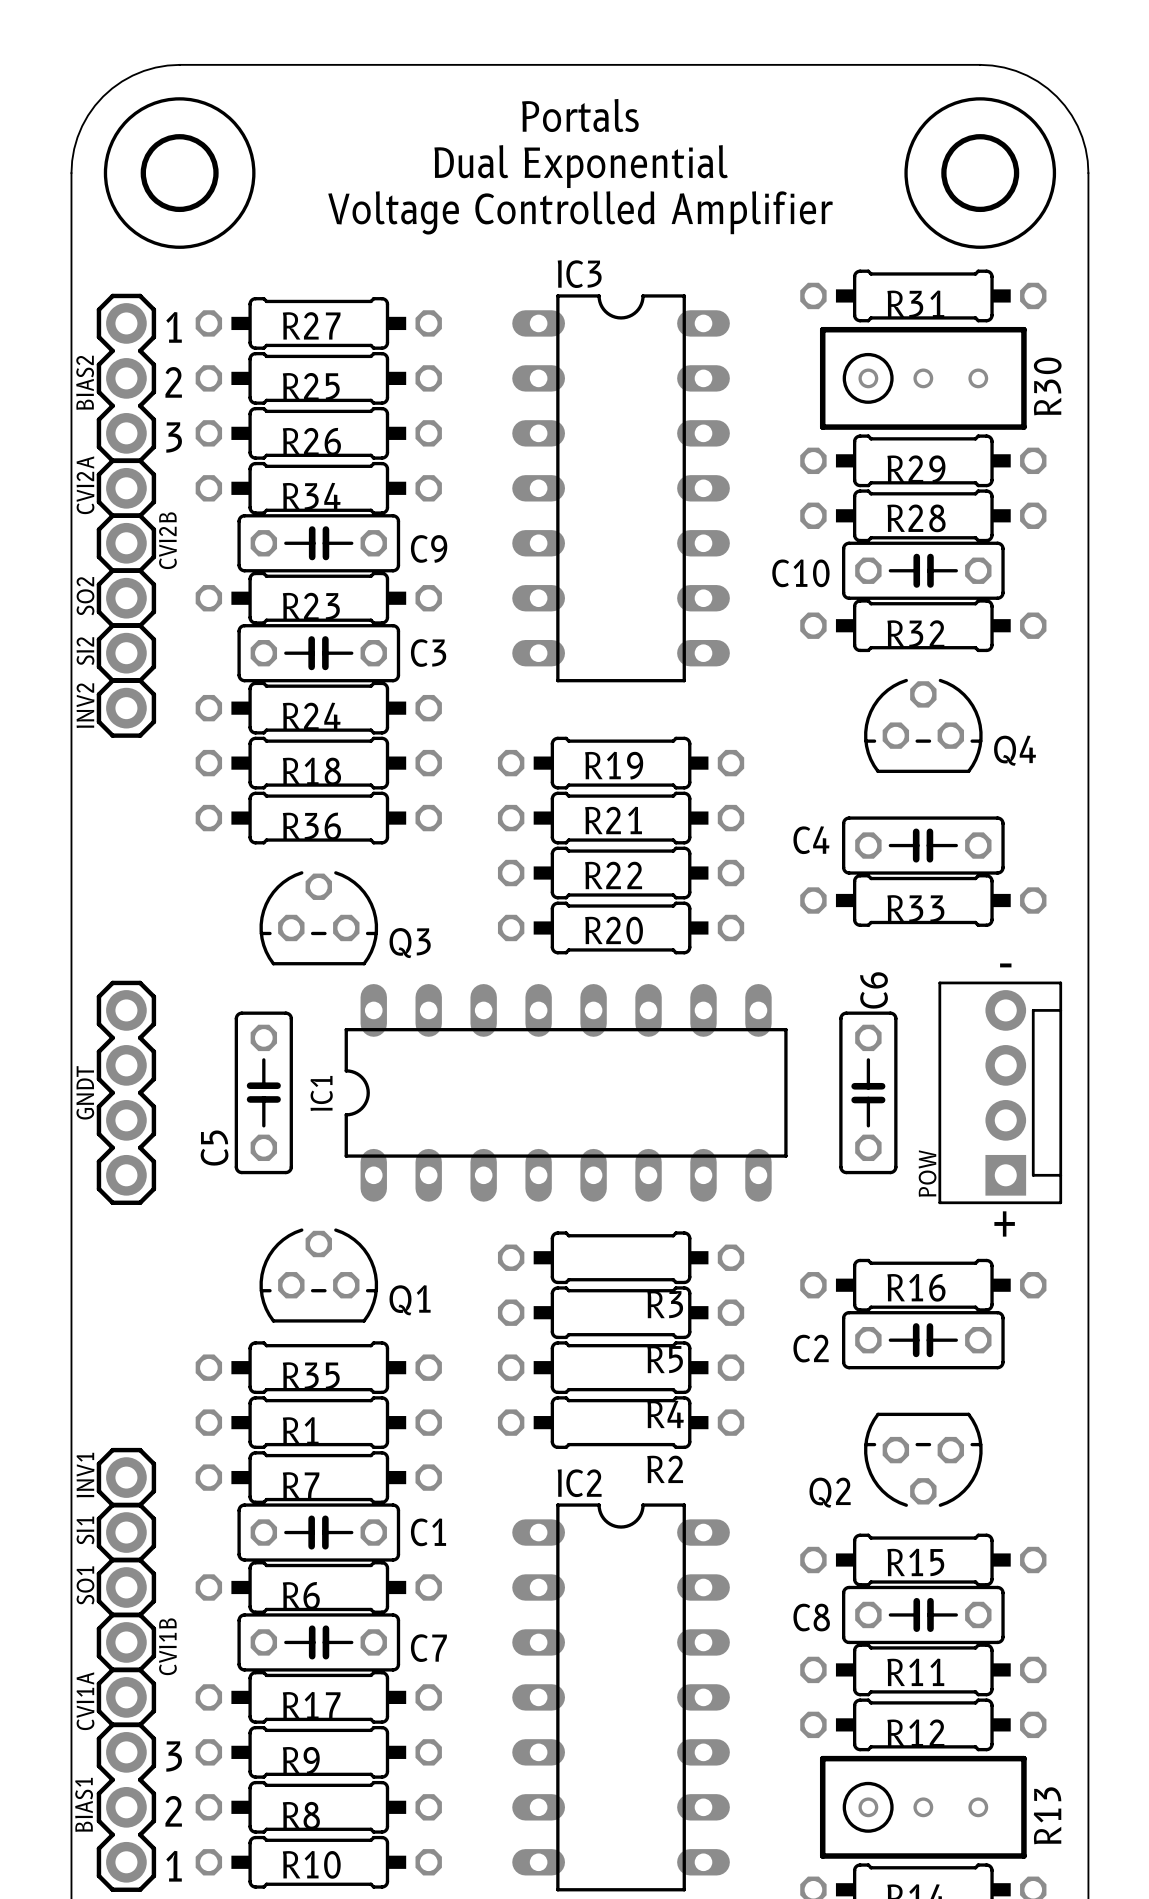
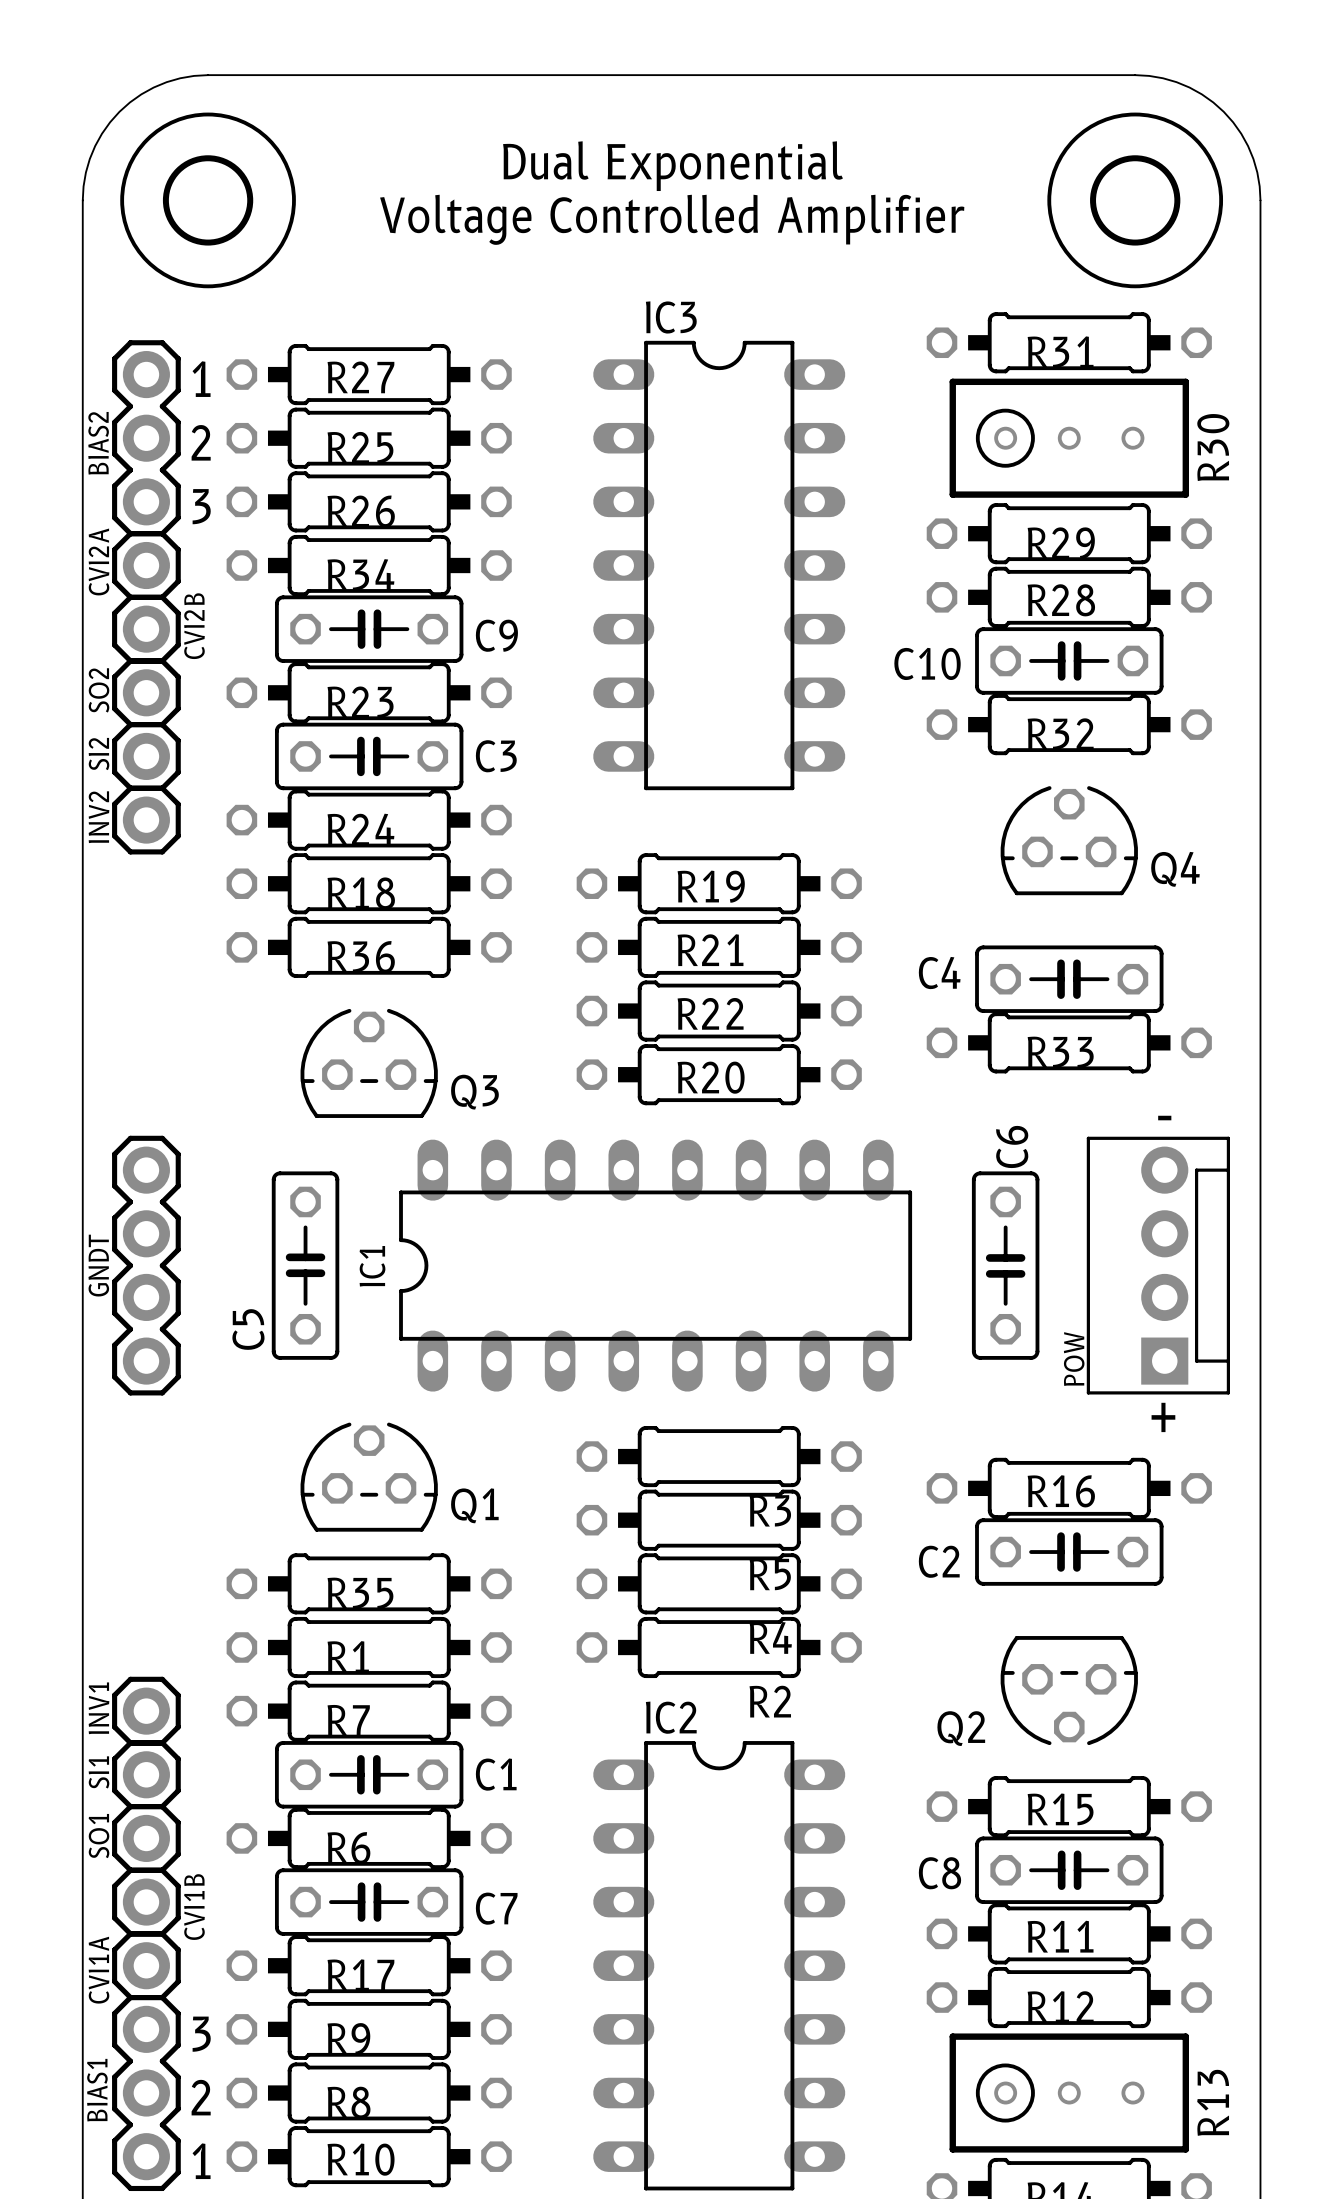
text: Portals (580, 115) -> none
text position: Dual Exponential (581, 166) -> Dual Exponential (673, 166)
text position: Voltage Controlled Amplifier (580, 212) -> Voltage Controlled Amplifier (672, 219)

